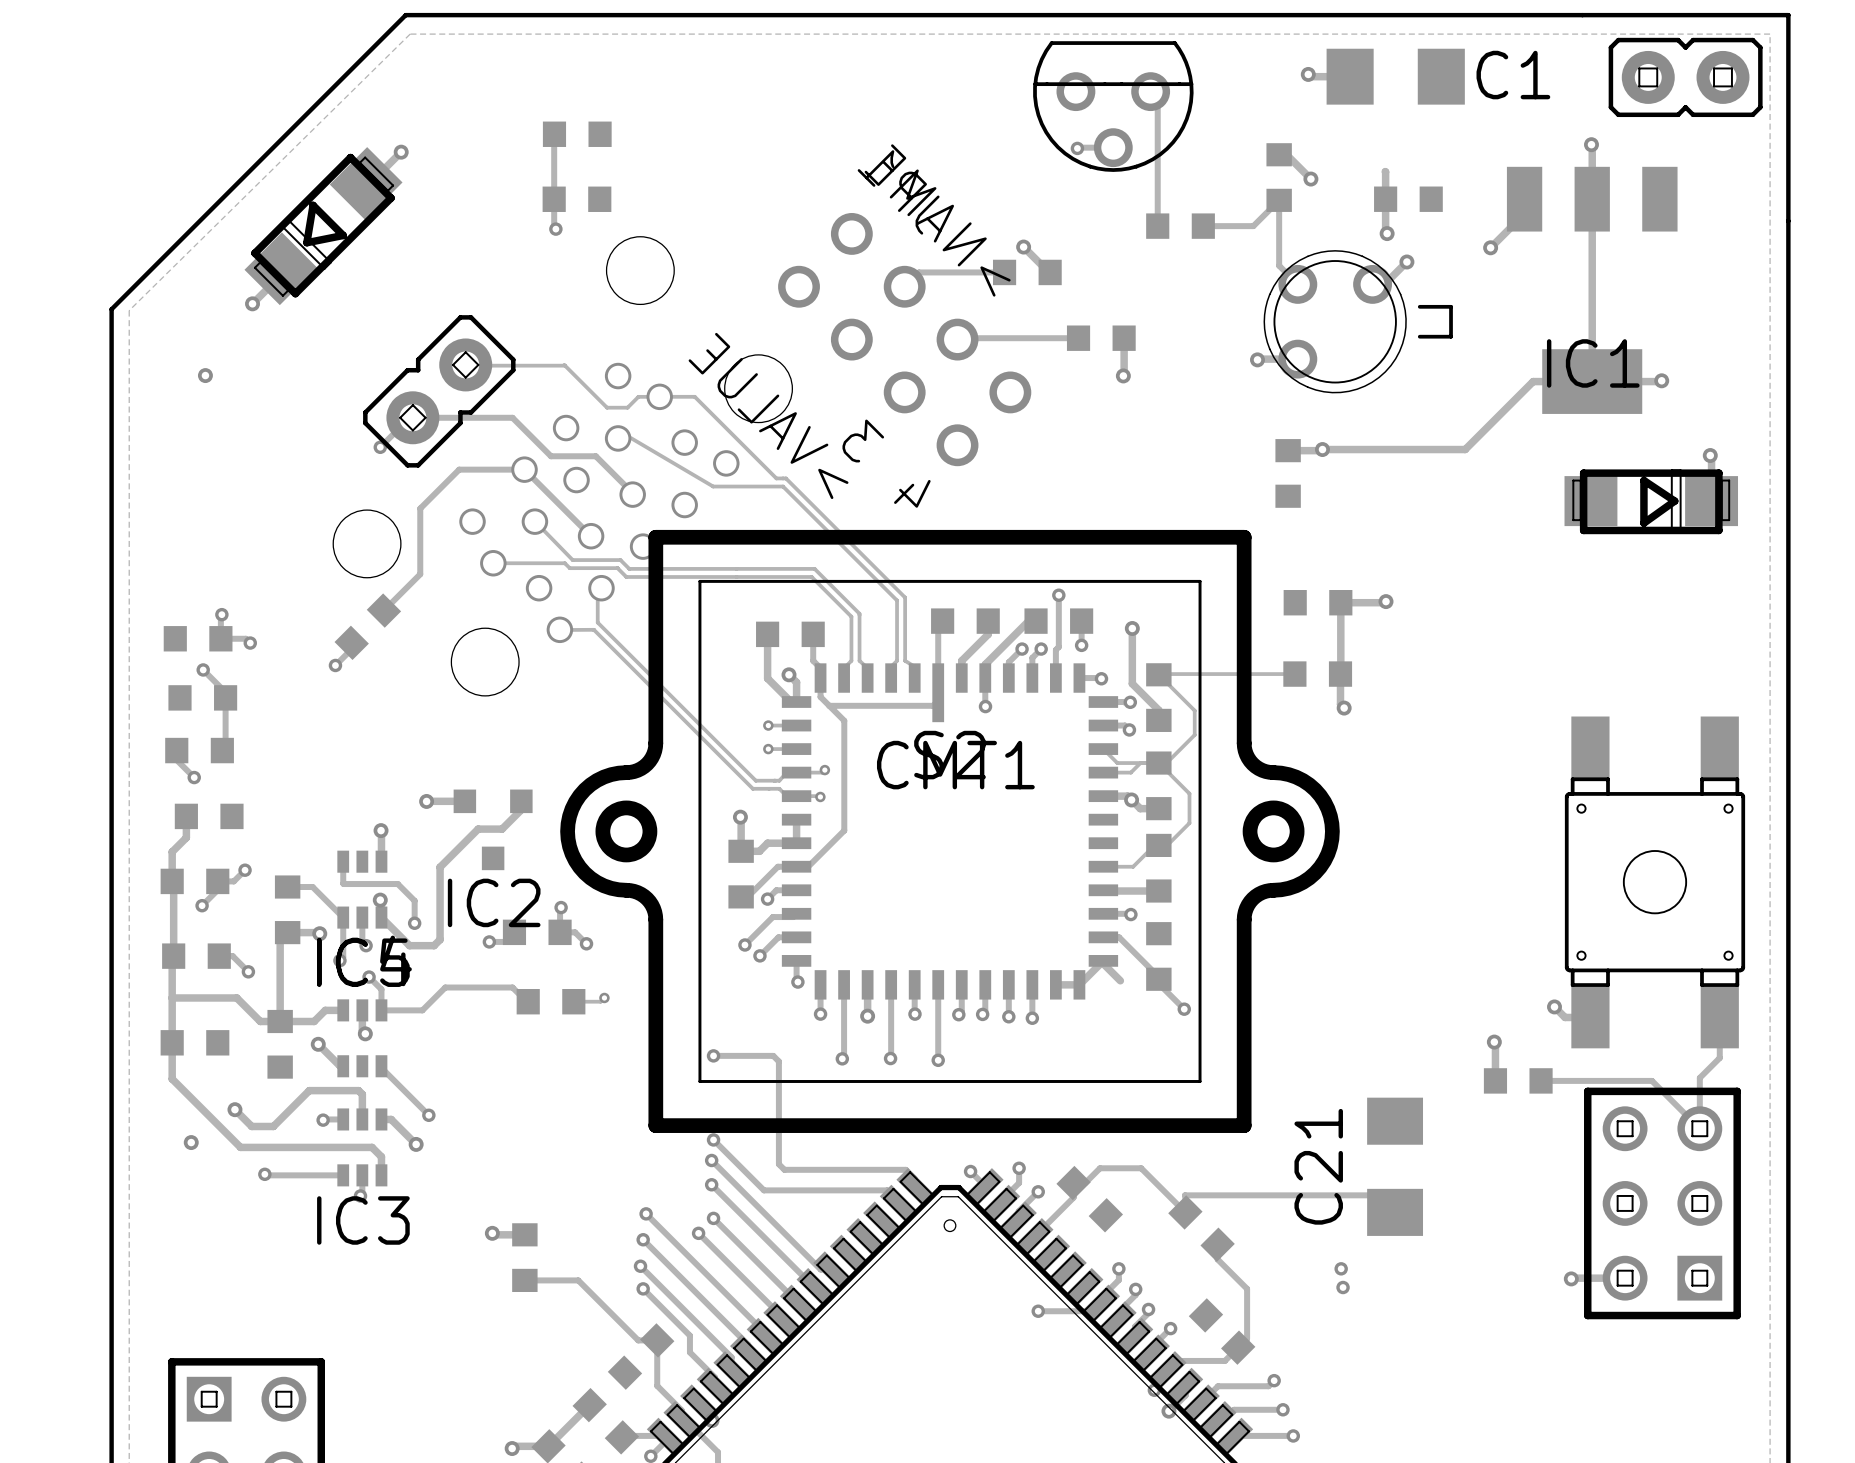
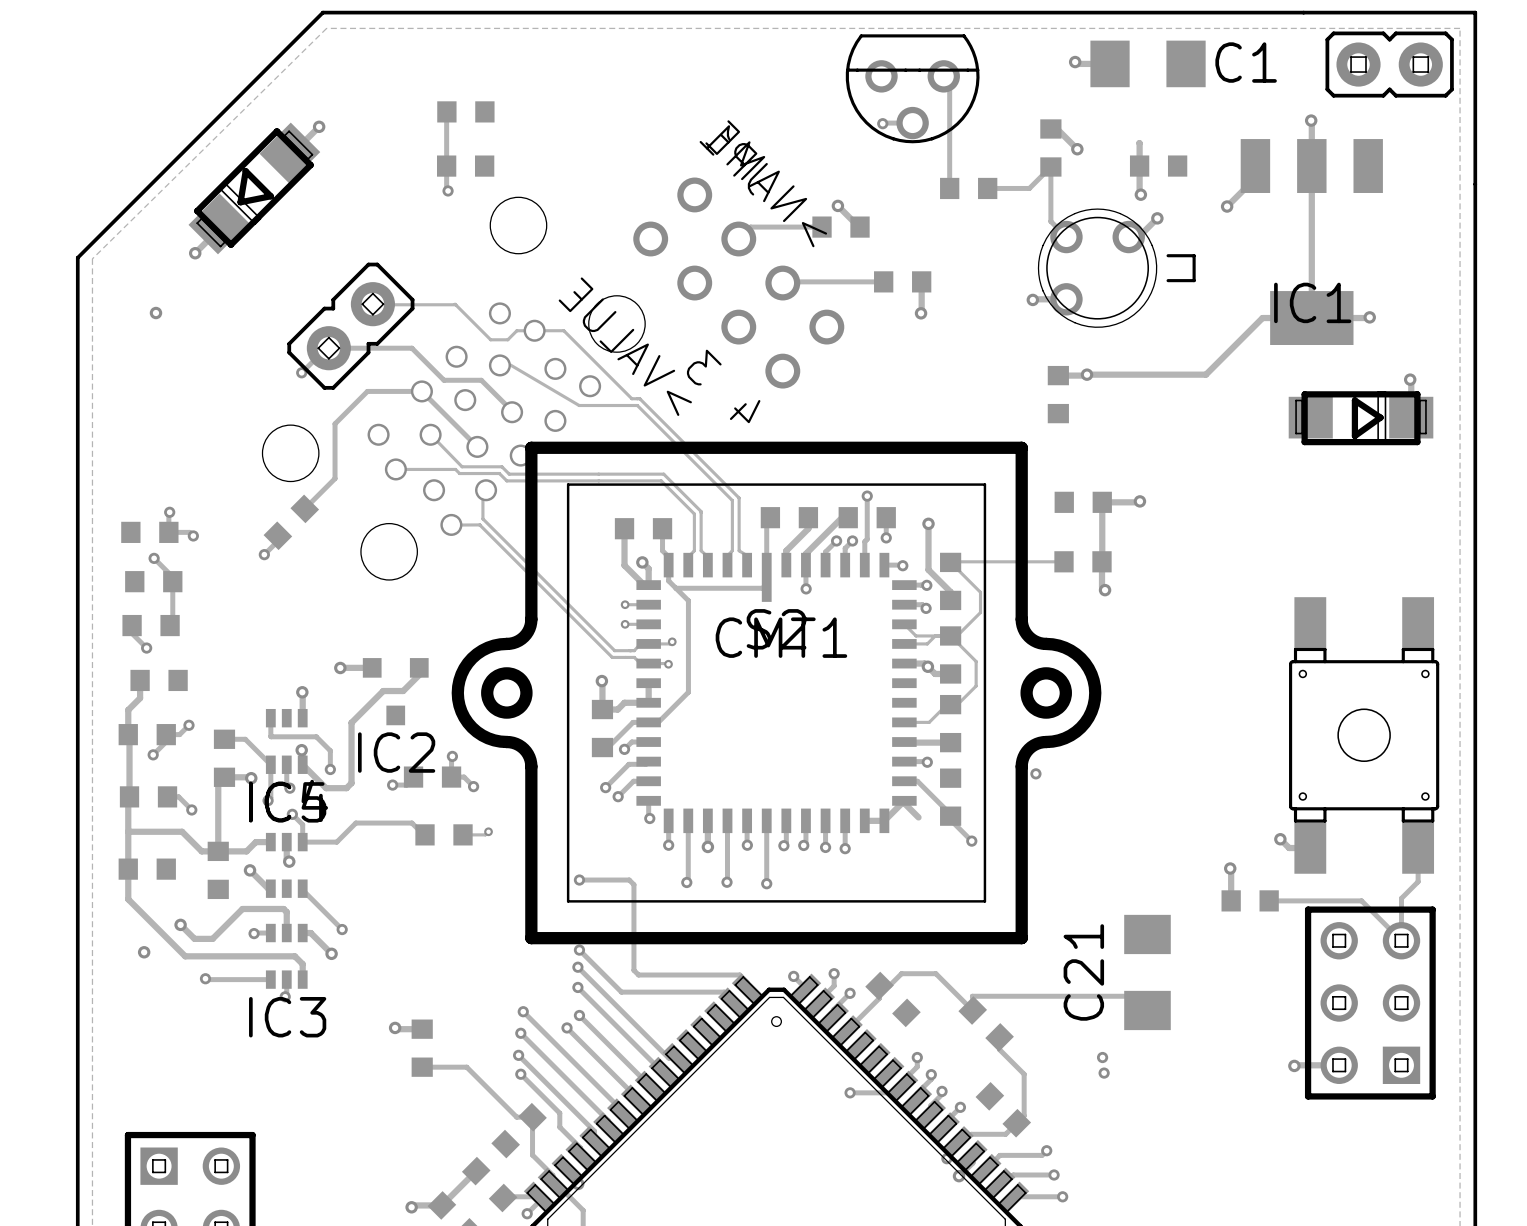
via: none -> (1035, 773)

